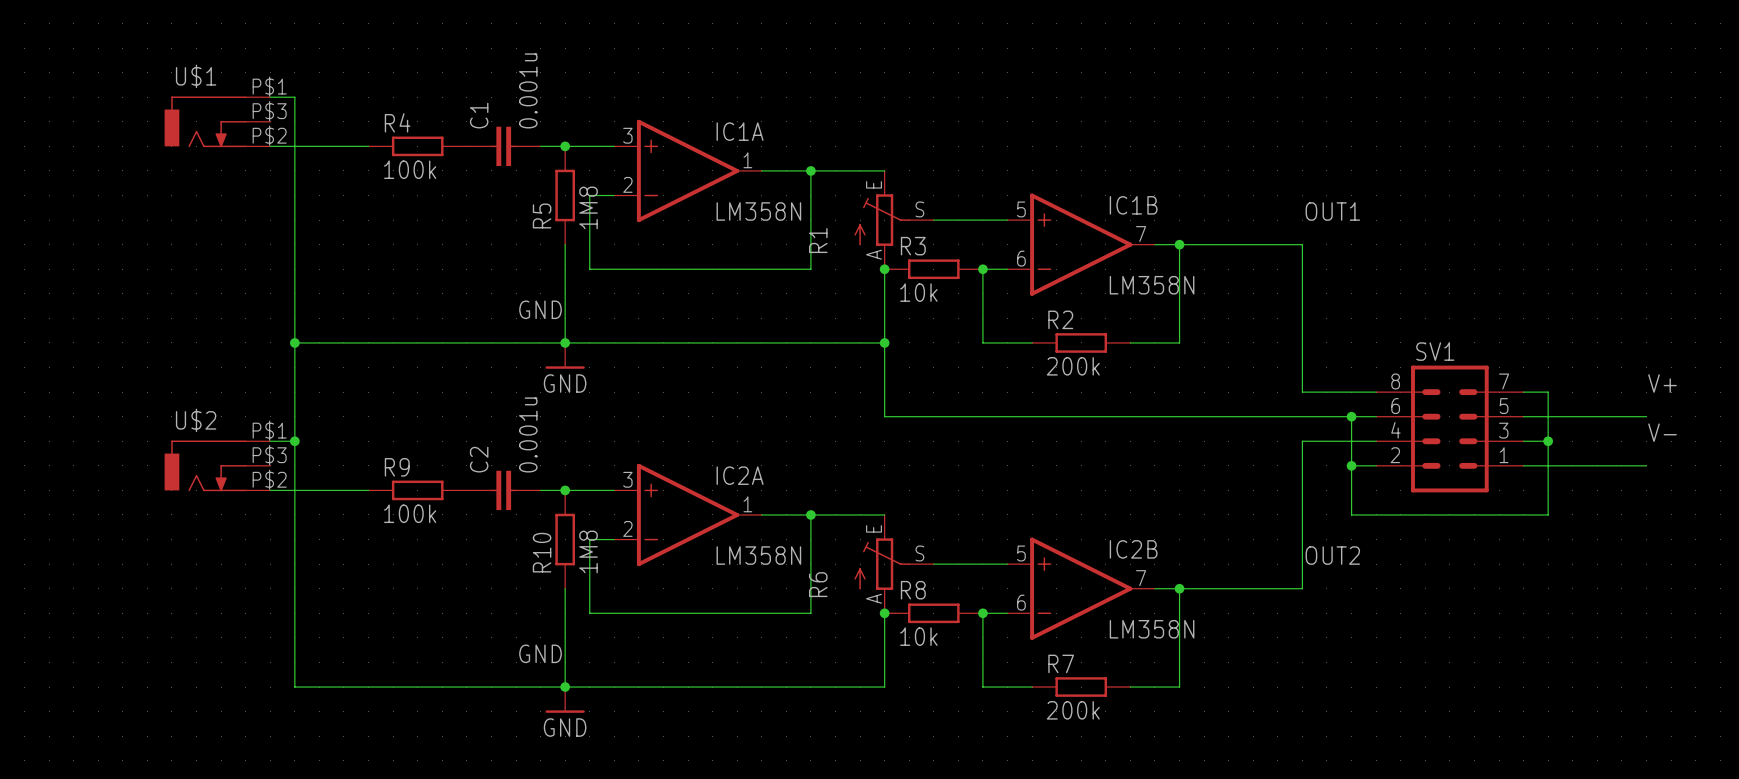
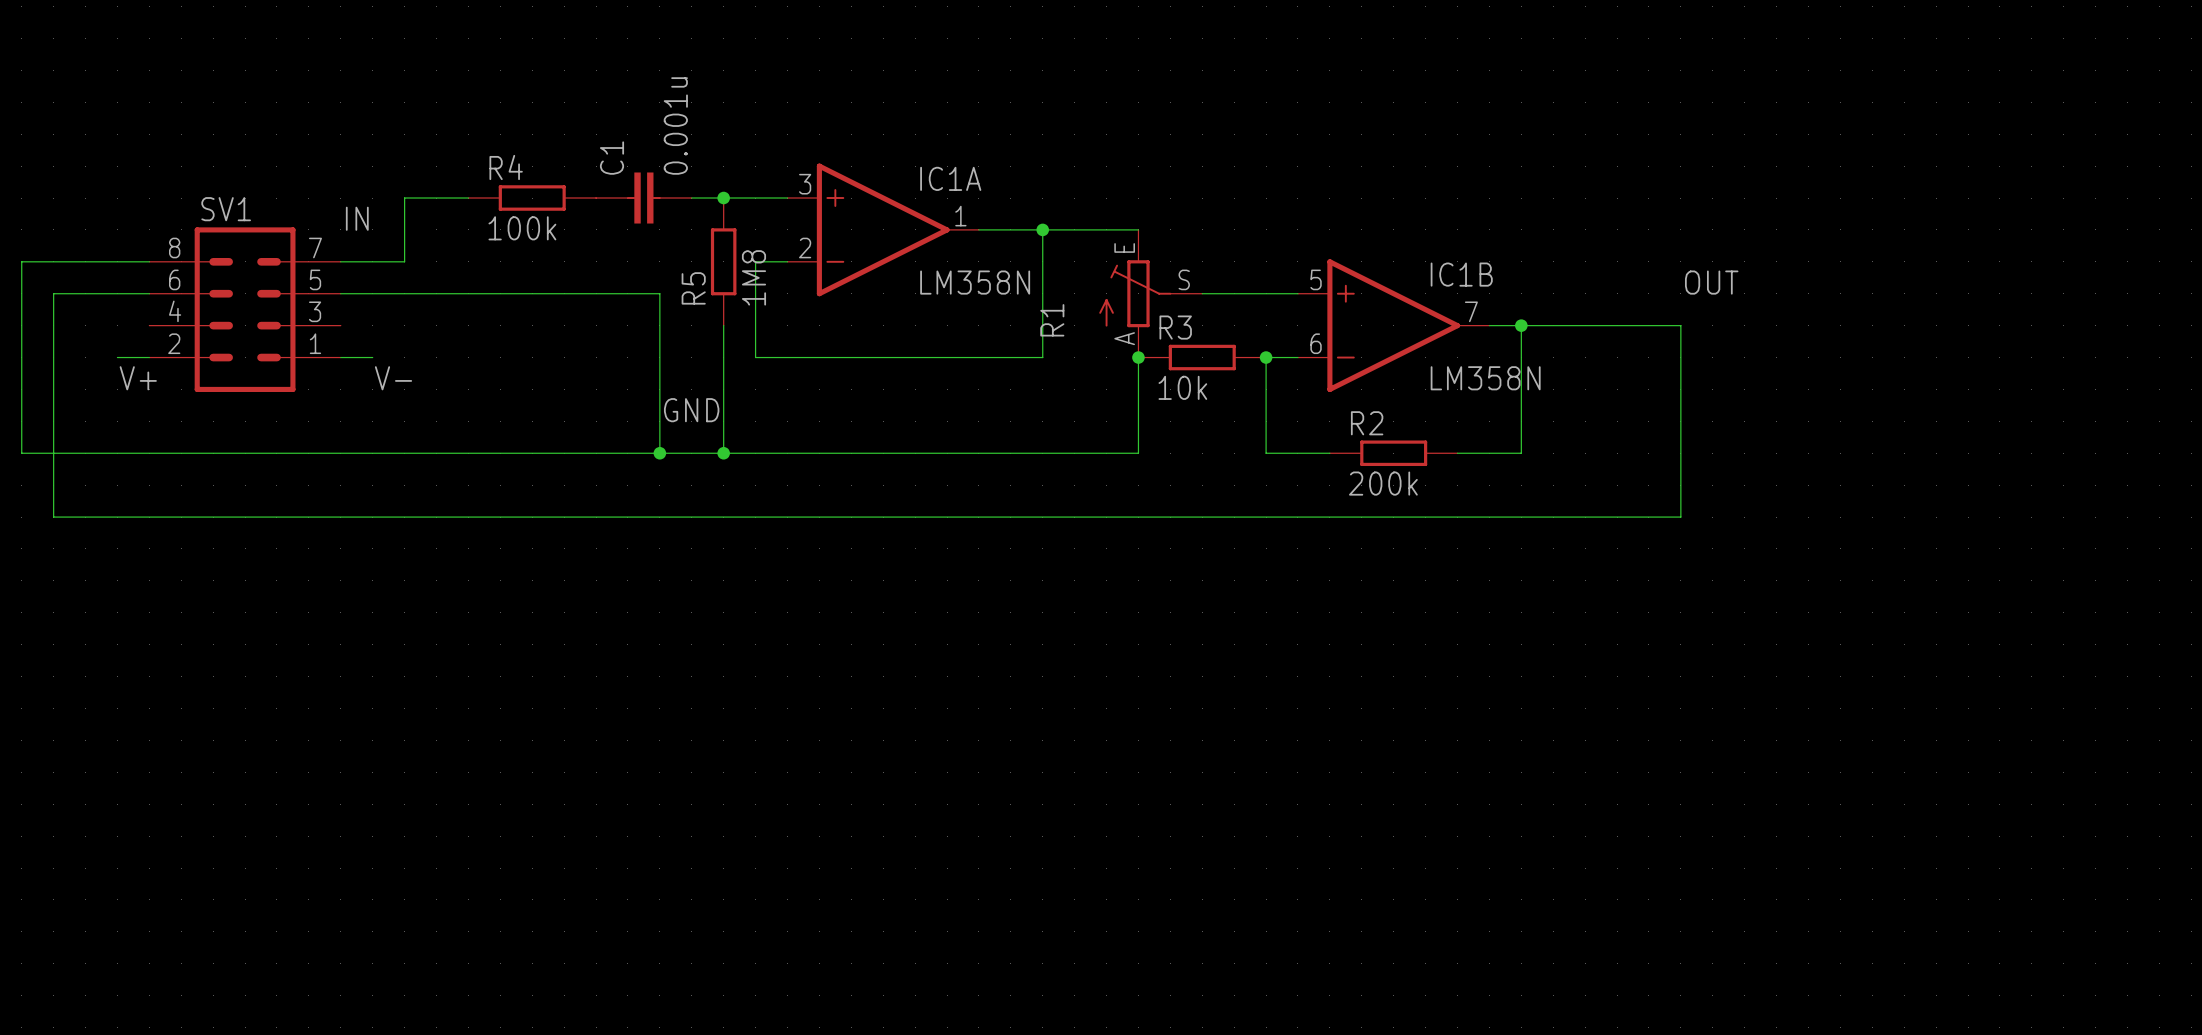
wire: (270, 97) (294, 97) (294, 687) (884, 687) (884, 613) -> none
U$1: (217, 121) -> none
wire: (270, 146) (319, 146) -> (340, 261) (404, 261) (404, 198)
label: none -> IN (357, 218)
wire: none -> (149, 261) (21, 261) (21, 453) (372, 453)
label: OUT1 (1332, 211) -> OUT (1711, 282)
wire: none -> (340, 293) (659, 293) (659, 453)
wire: none -> (117, 357) (149, 357)
label: none -> V+ (138, 378)
label: none -> V- (393, 378)
junction: (294, 342) -> none
junction: none -> (659, 453)
wire: (884, 342) (884, 416) (1376, 416) -> none
junction: (884, 342) -> none
power symbol: GND (565, 355) -> none
label: V+ (1662, 383) -> none
wire: (1302, 392) (1376, 392) -> (1680, 517) (53, 517) (53, 293) (149, 293)
wire: (1523, 392) (1548, 392) (1548, 514) (1351, 514) (1351, 416) -> none
junction: (1351, 416) -> none
wire: (1523, 416) (1646, 416) -> none
SV1 position: (1449, 428) -> (245, 309)
label: V- (1662, 432) -> none
wire: (270, 441) (294, 441) -> (340, 357) (372, 357)
junction: (294, 441) -> none
wire: (1376, 441) (1302, 441) (1302, 588) (1154, 588) -> none
wire: (1523, 441) (1548, 441) -> none
junction: (1548, 441) -> none
U$2: (217, 465) -> none
wire: (1351, 465) (1376, 465) -> none
junction: (1351, 465) -> none
wire: (1523, 465) (1646, 465) -> none
wire: (270, 490) (368, 490) -> none
R9: 100k (417, 490) -> none
C2: 0.001u (503, 490) -> none
wire: (540, 490) (614, 490) -> none
junction: (565, 490) -> none
IC2A: LM358N (688, 514) -> none
wire: (761, 514) (884, 514) -> none
wire: (810, 514) (810, 613) (589, 613) (589, 539) (614, 539) -> none
junction: (810, 514) -> none
R10: 1M8 (565, 539) -> none
label: OUT2 (1332, 555) -> none
R6: (894, 564) -> none
wire: (933, 564) (1007, 564) -> none
wire: (565, 588) (565, 687) -> none
IC2B: LM358N (1081, 588) -> none
wire: (1179, 588) (1179, 687) (1130, 687) -> none
junction: (1179, 588) -> none
junction: (884, 613) -> none
R8: 10k (933, 613) -> none
junction: (982, 613) -> none
wire: (1007, 613) (982, 613) (982, 687) (1032, 687) -> none
label: GND (540, 653) -> none
junction: (565, 687) -> none
R7: 200k (1081, 687) -> none
power symbol: GND (565, 699) -> none

